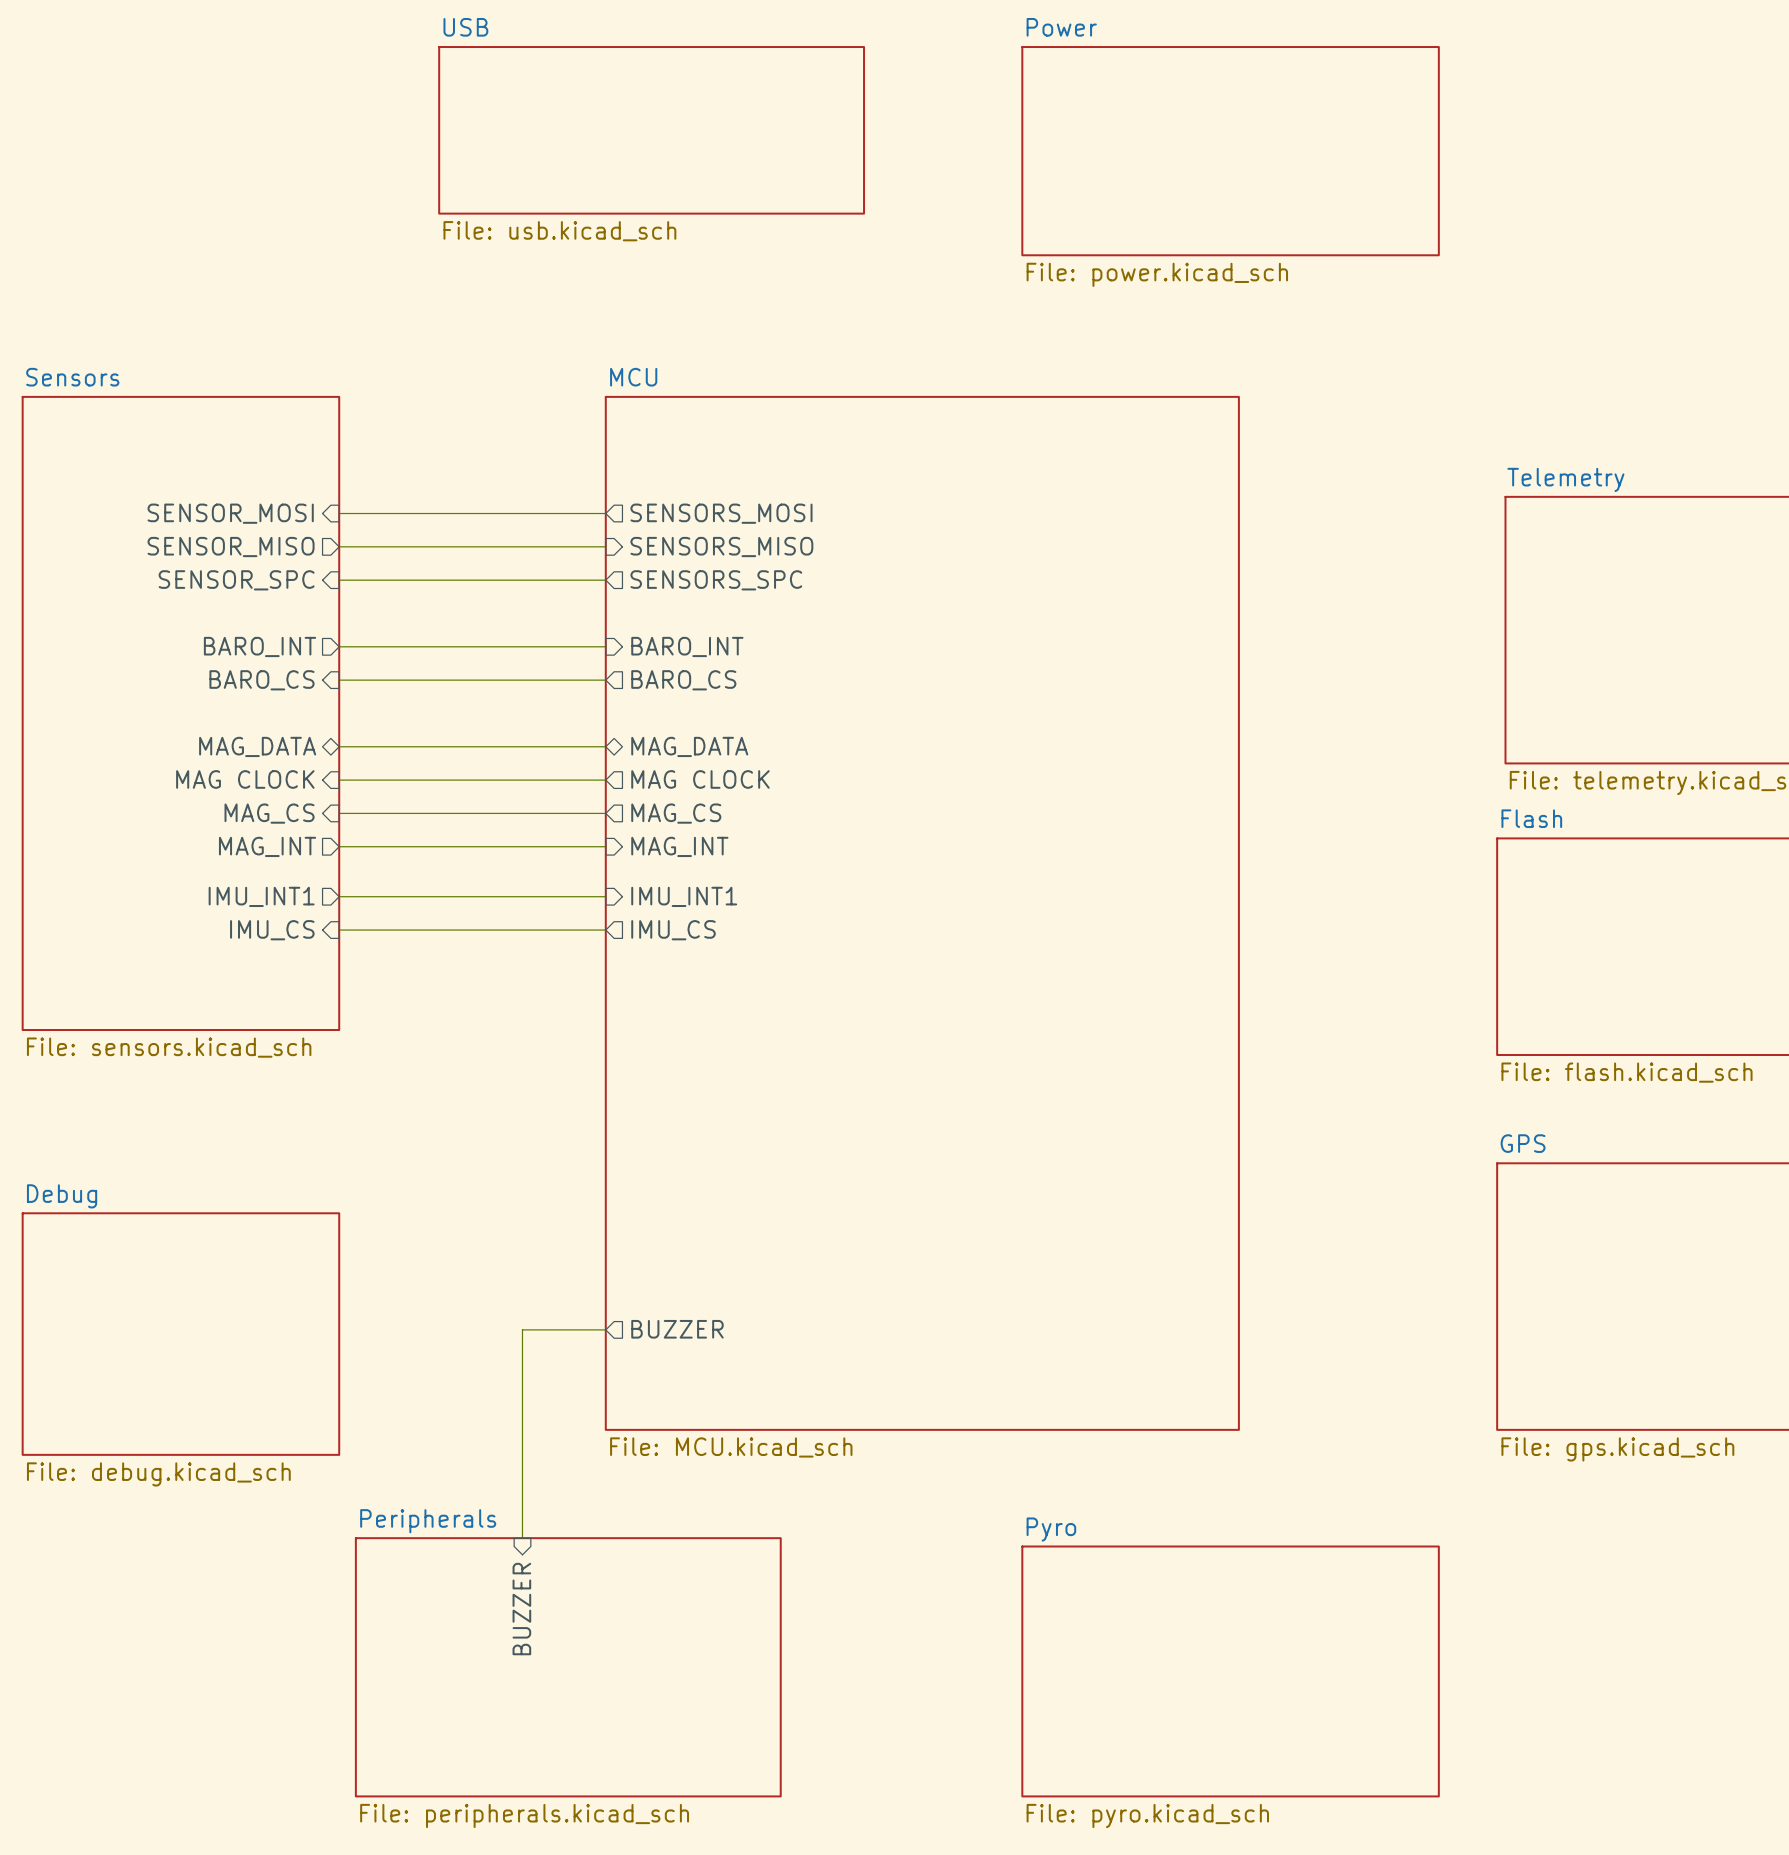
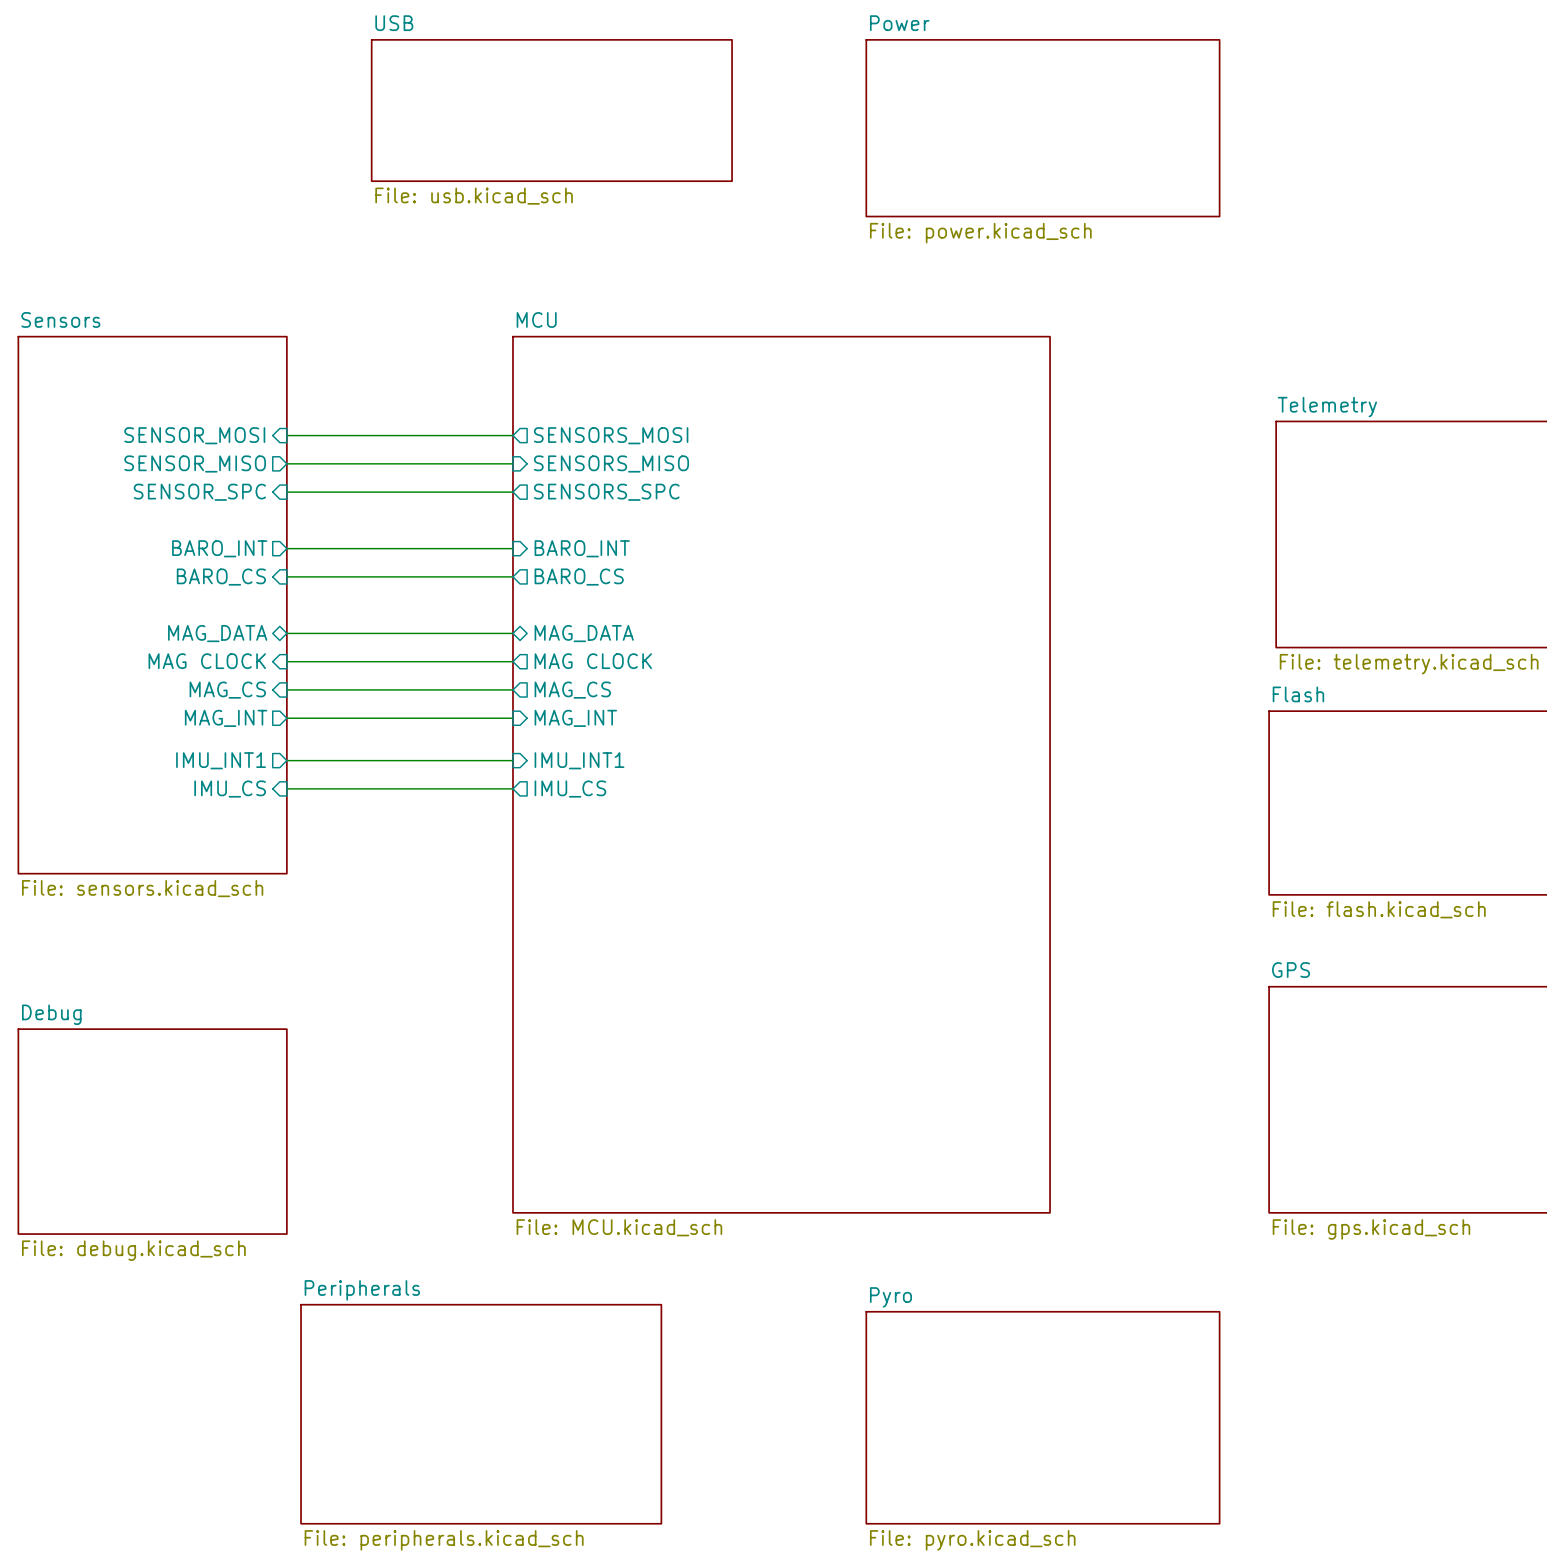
wire: (605, 1329) (522, 1329) (522, 1538) -> none
sheet pin: BUZZER (677, 1329) -> none
sheet pin: BUZZER (521, 1609) -> none

